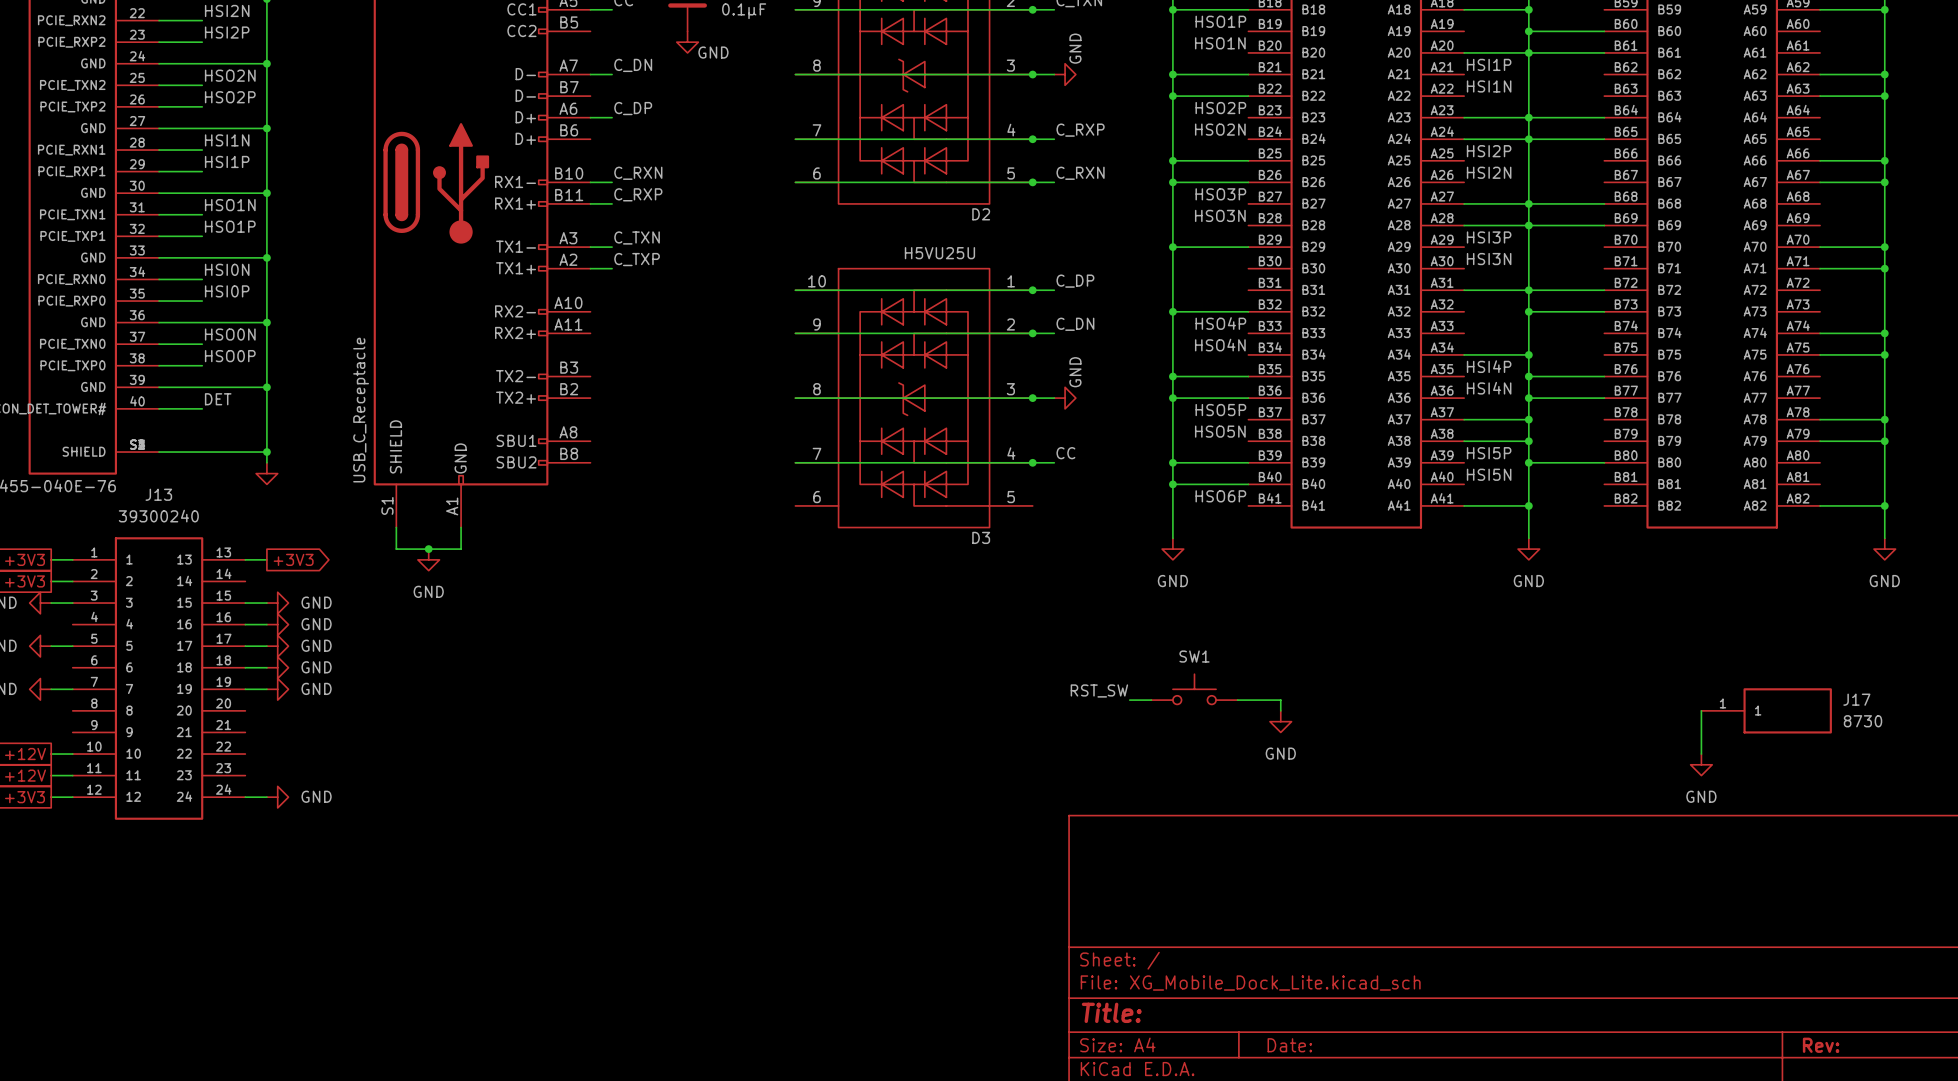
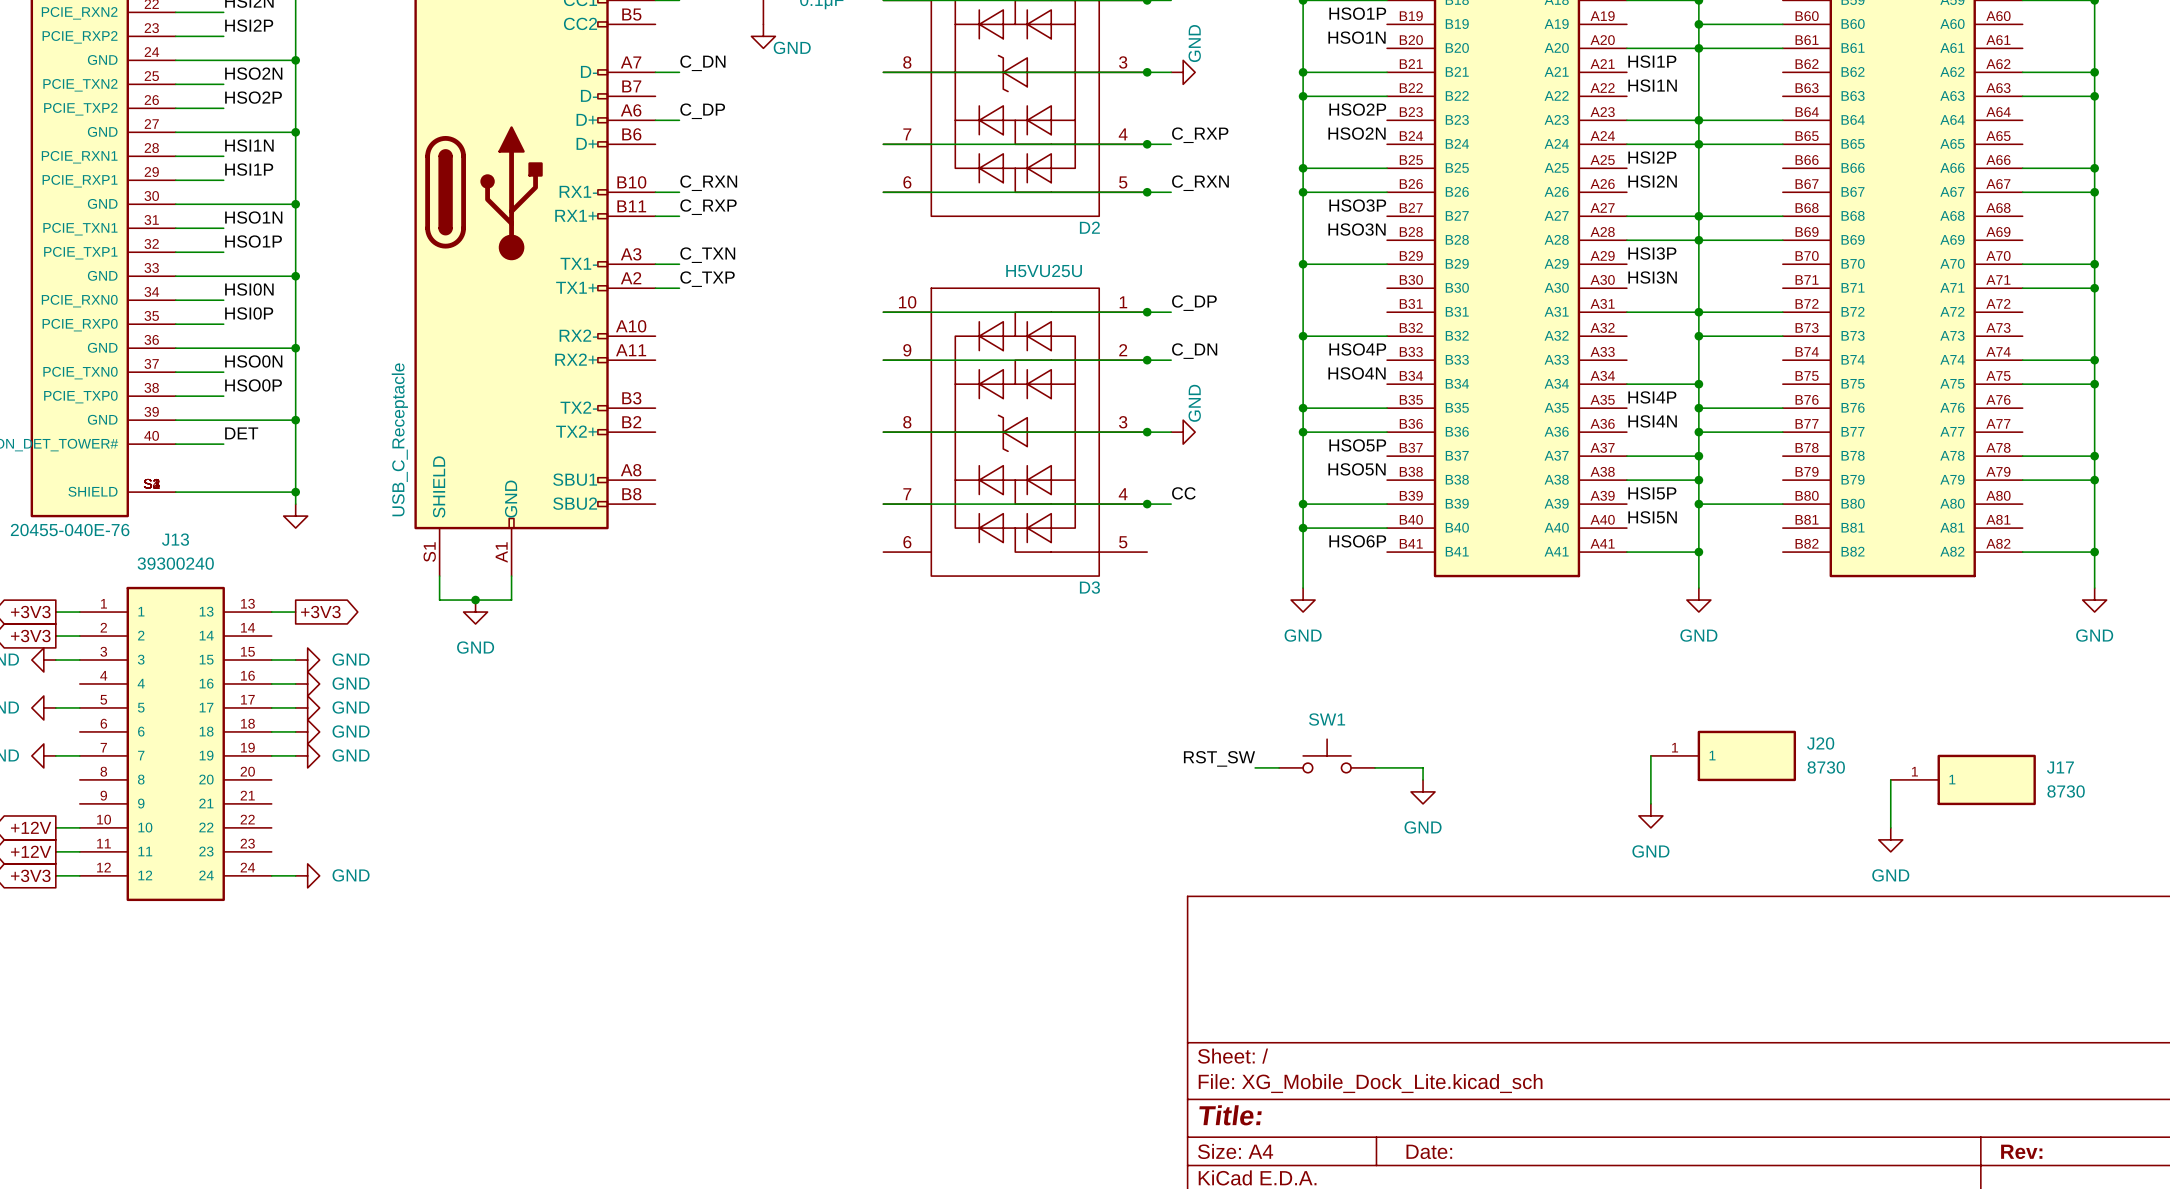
wire: none -> (1650, 755) (1650, 803)
J20: none -> 8730 (1723, 755)
power symbol: none -> GND (1650, 815)

